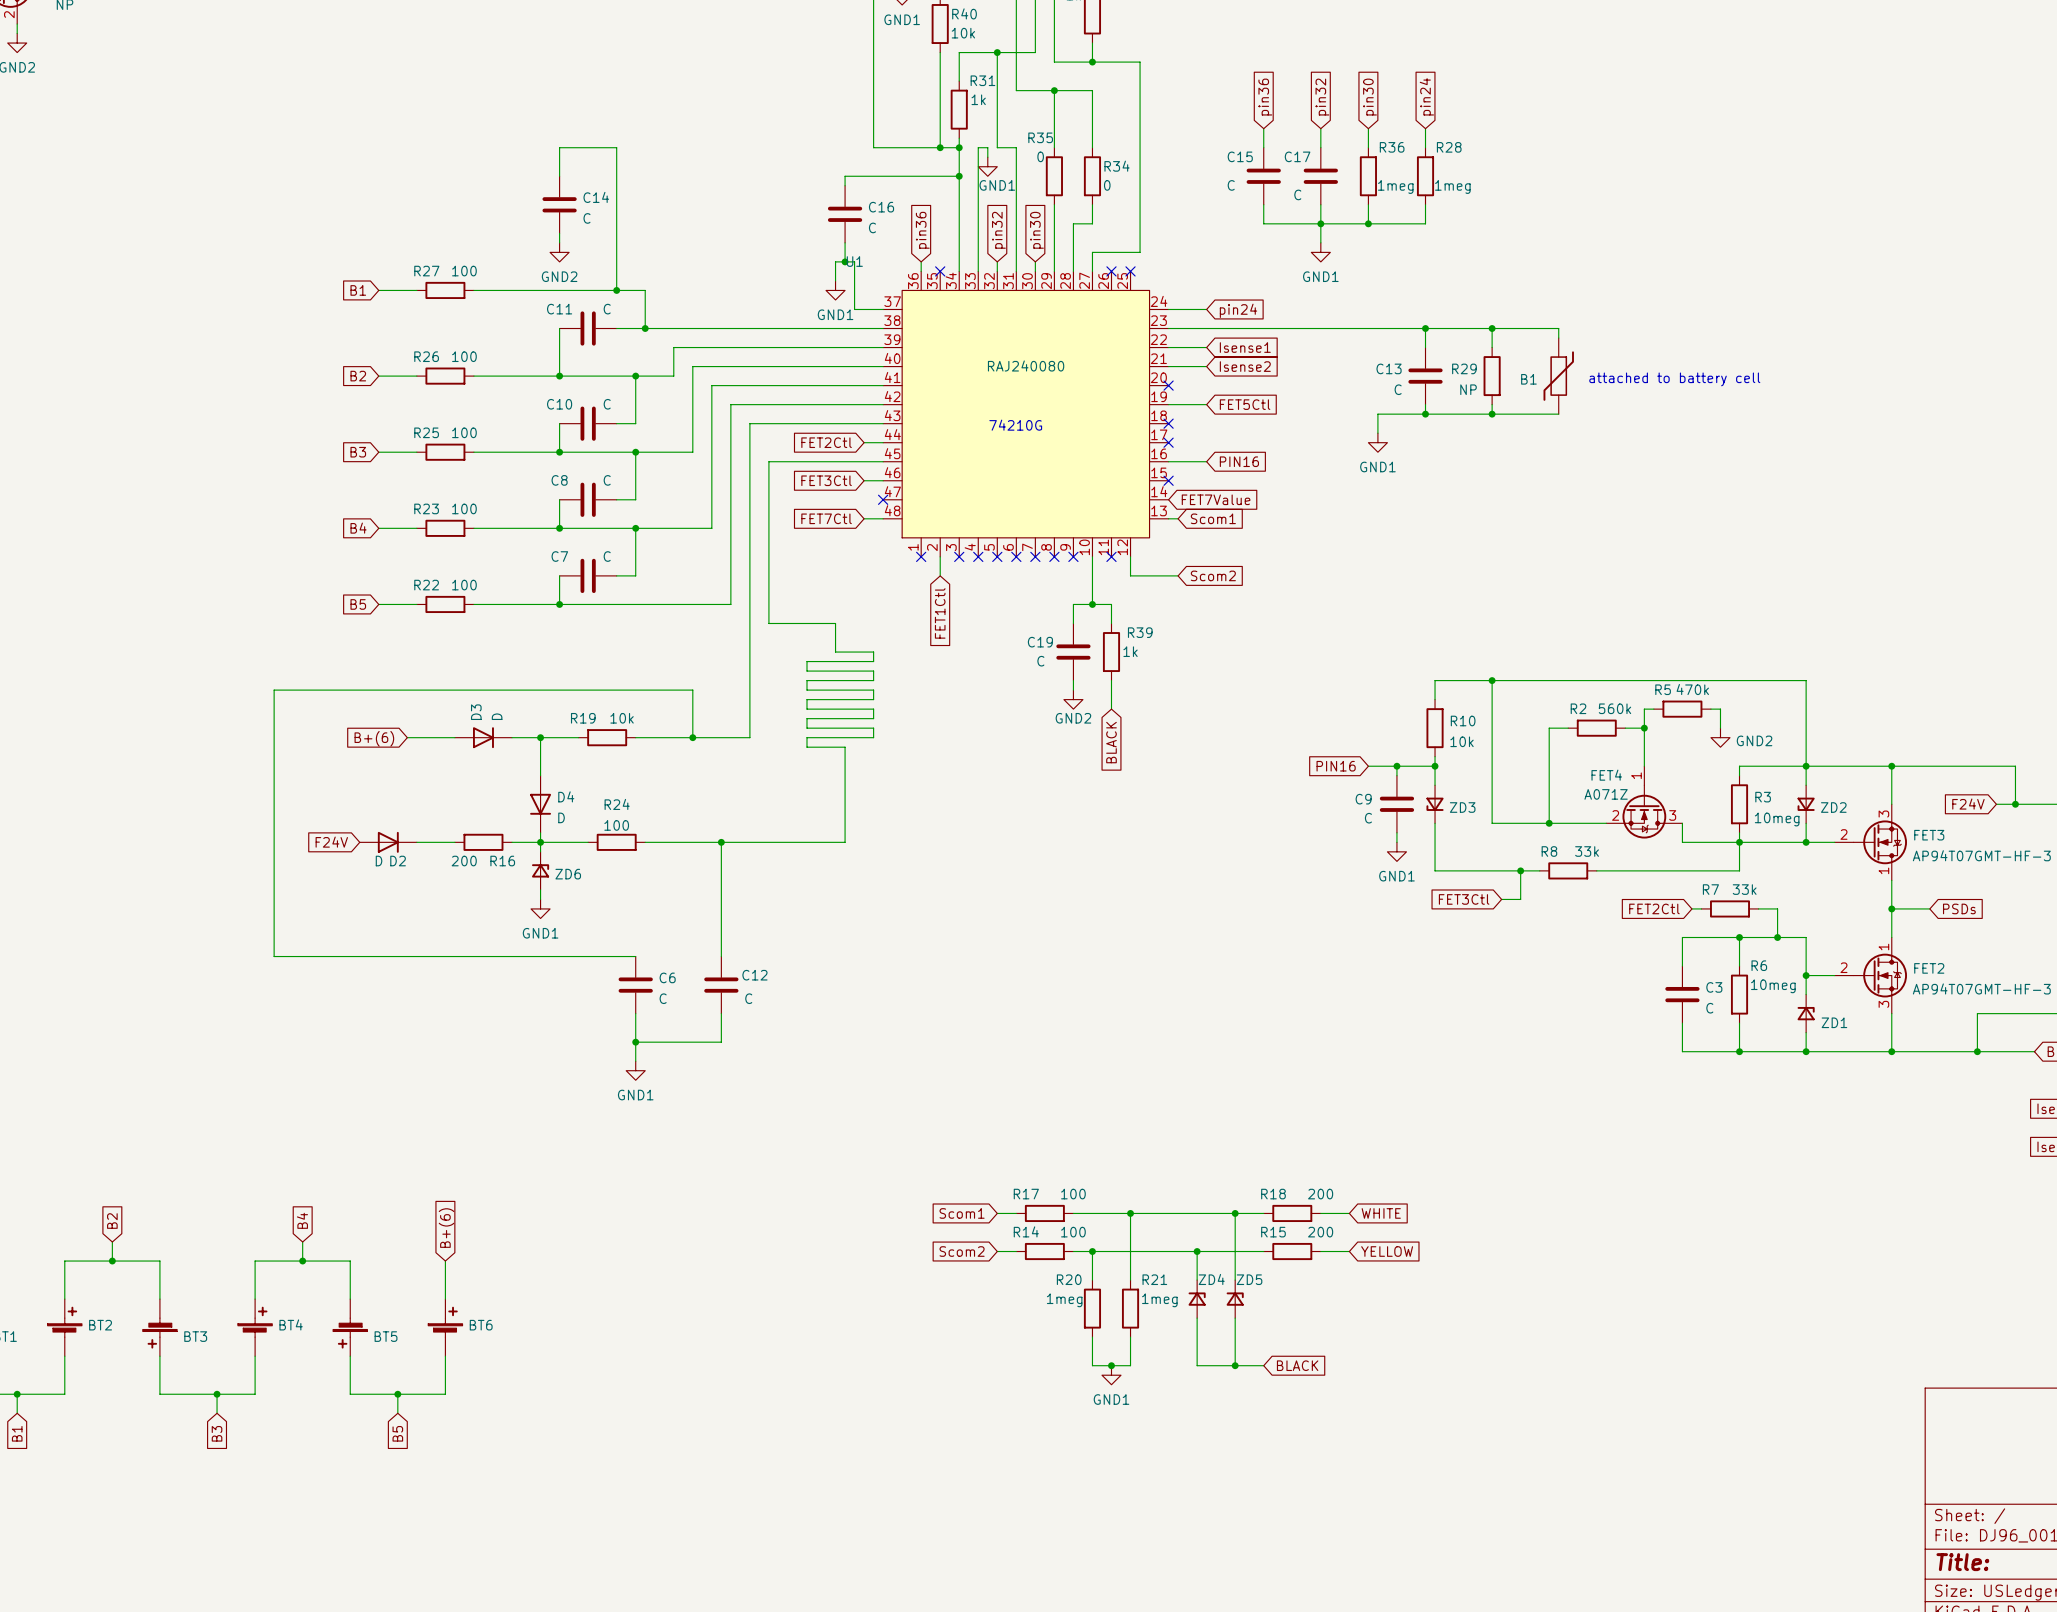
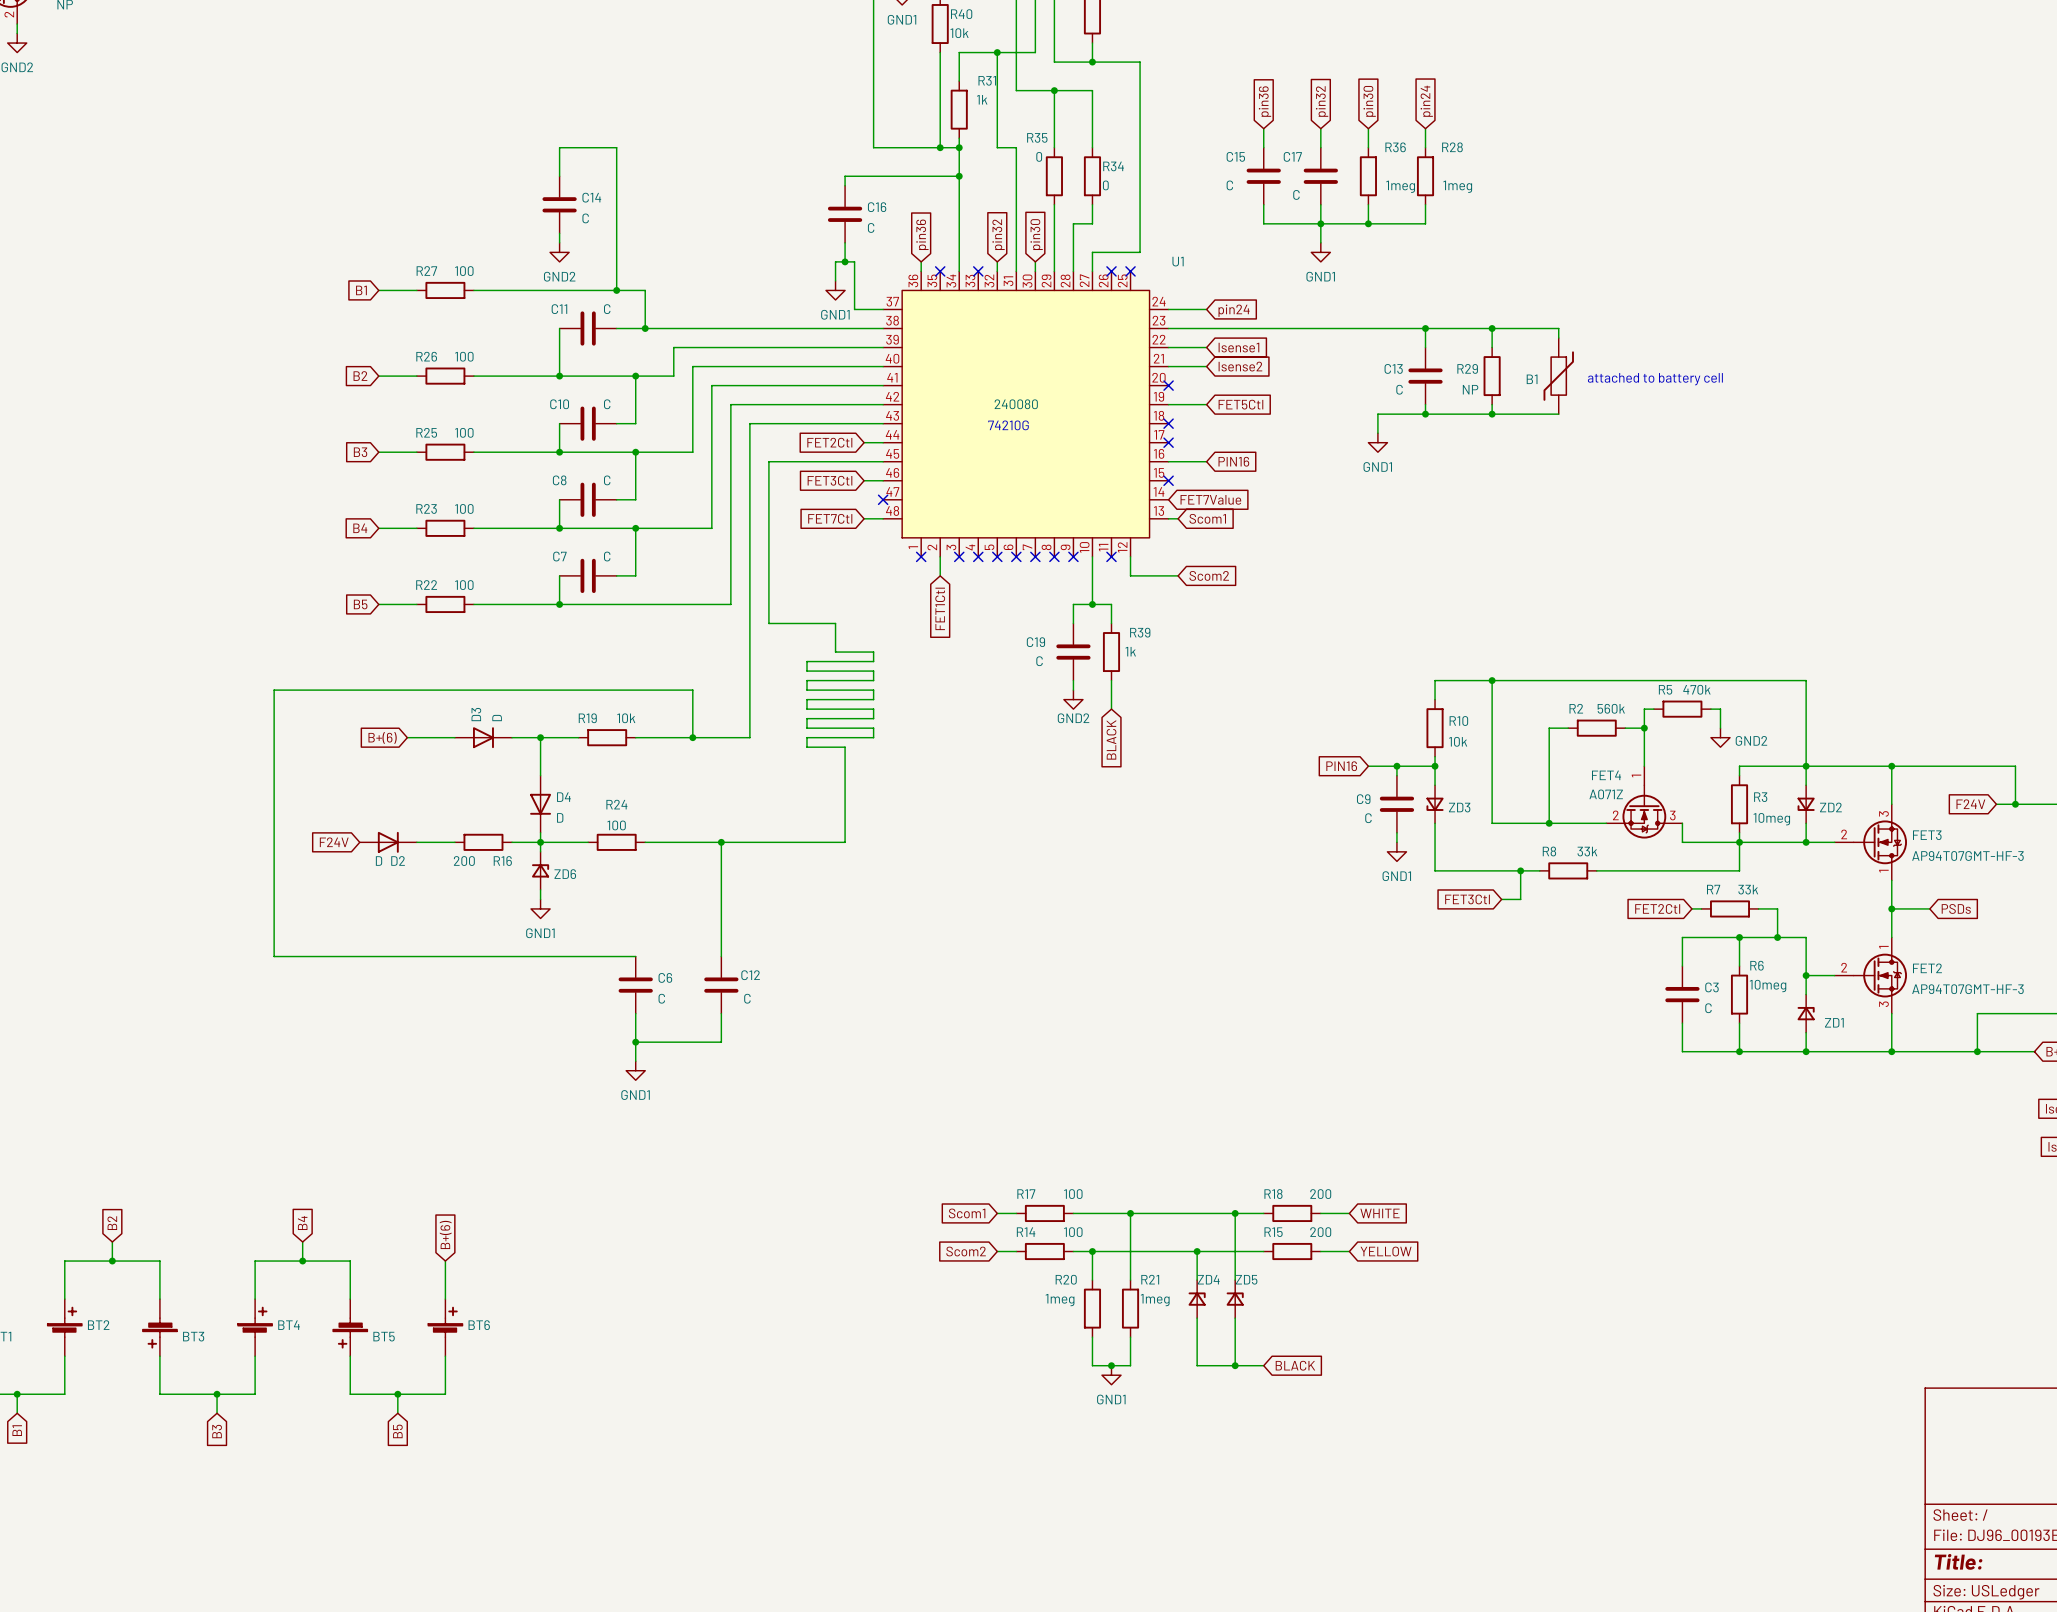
wire: (987, 157) (987, 147) (978, 147) (978, 271) -> none
power symbol: GND1 (987, 166) -> none
U1 name position: U1 (854, 261) -> U1 (1178, 261)
no-connect mark: none -> (978, 271)
U1 value: RAJ240080 (1026, 365) -> 240080 (1016, 404)

